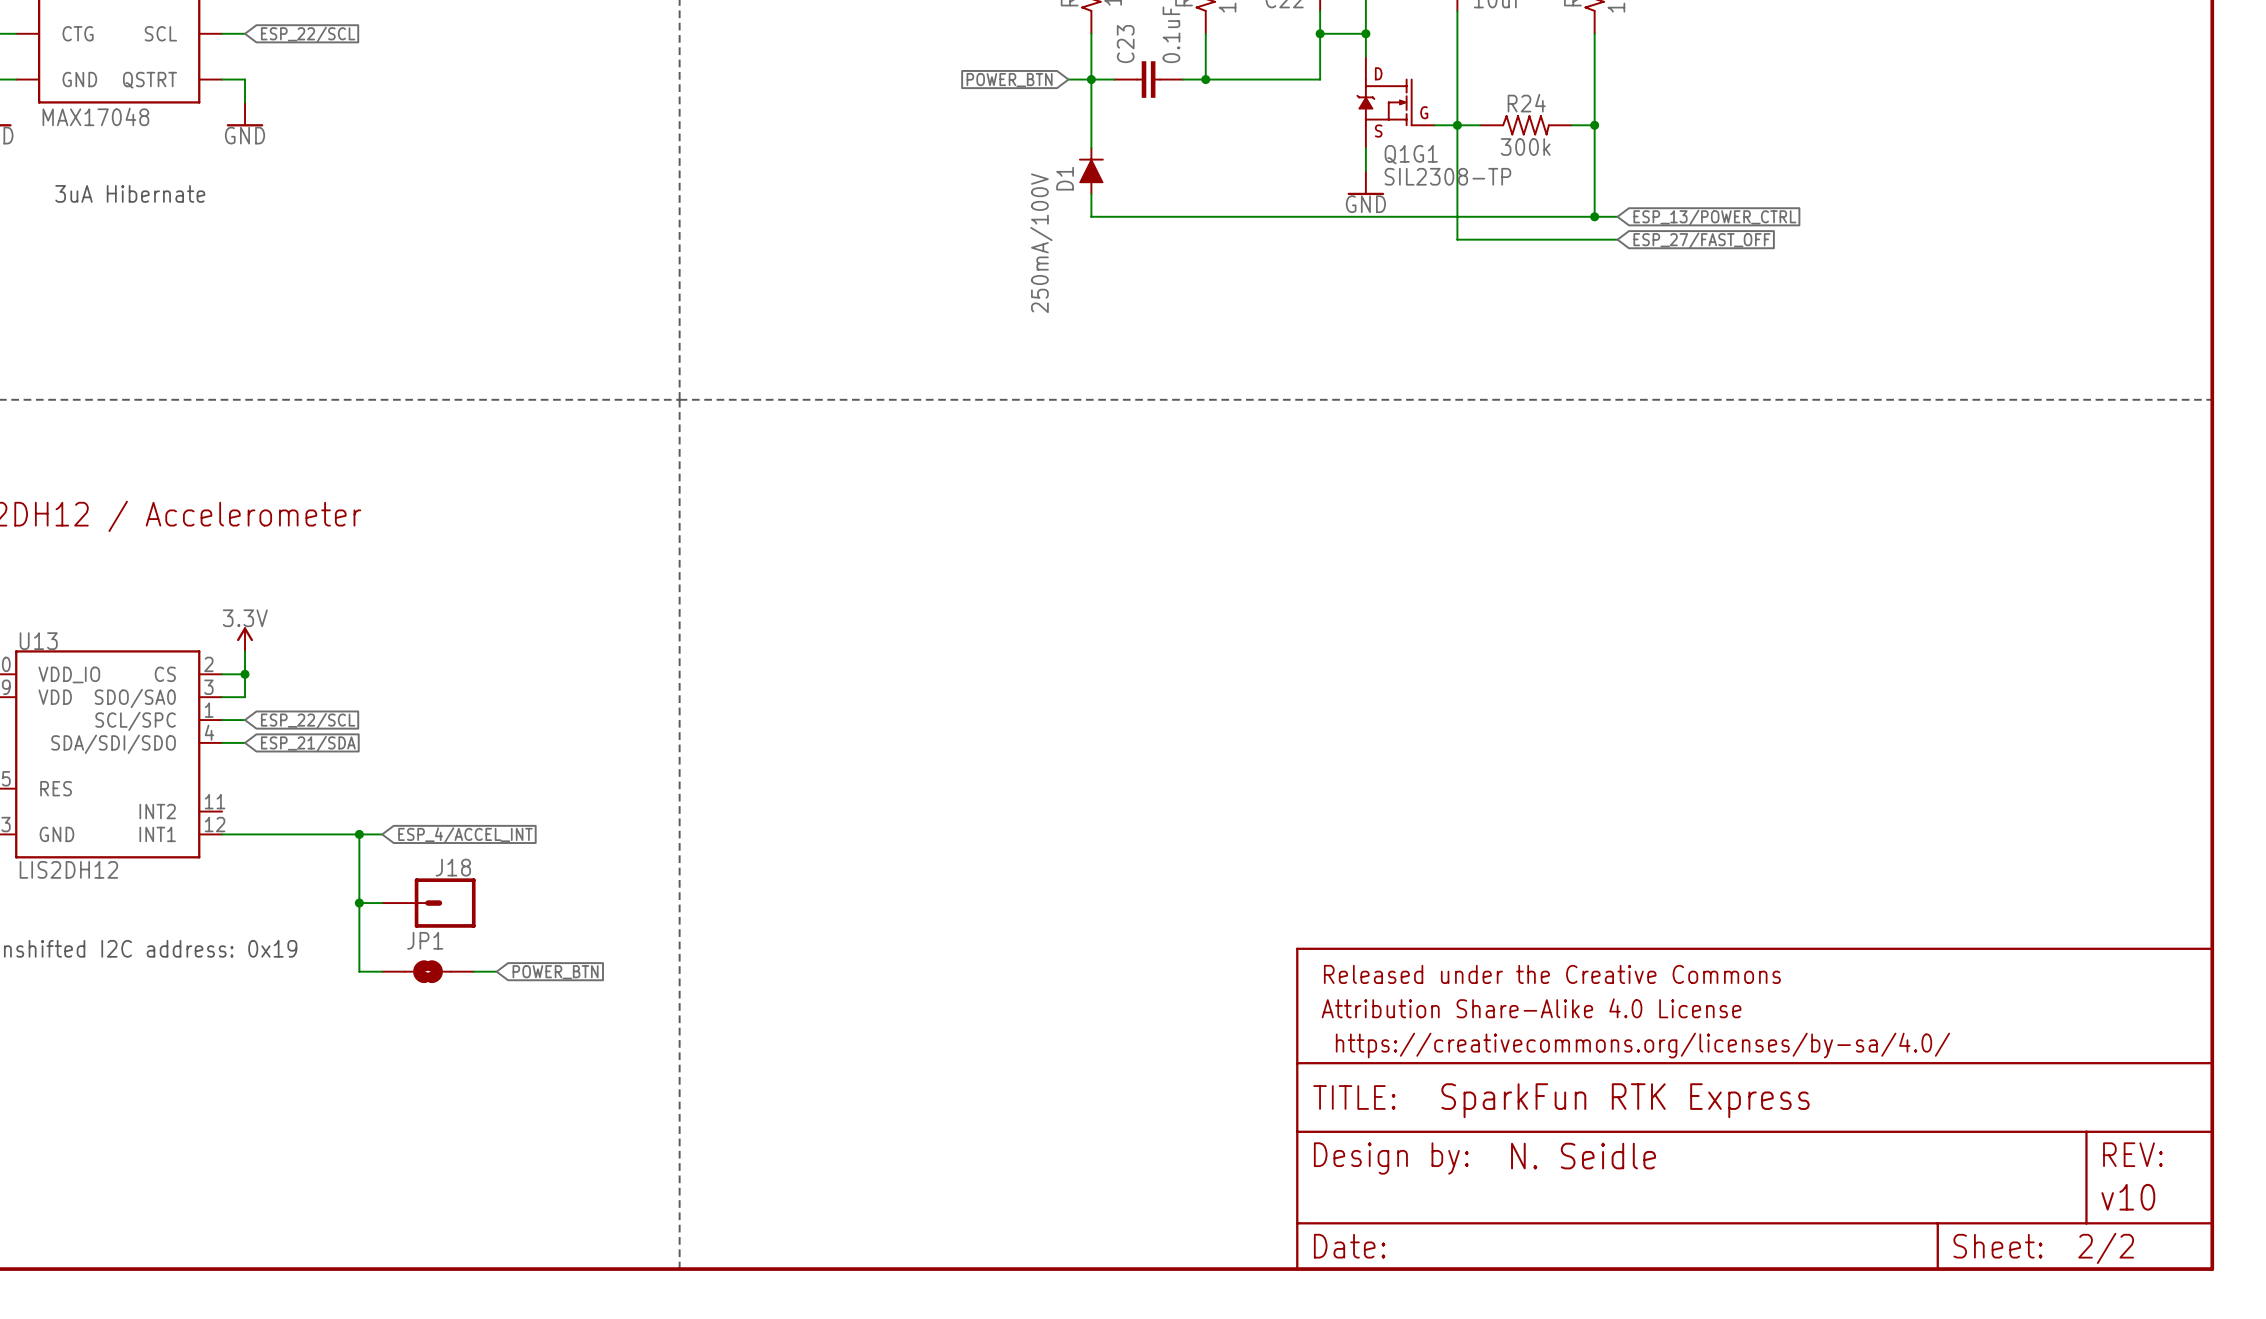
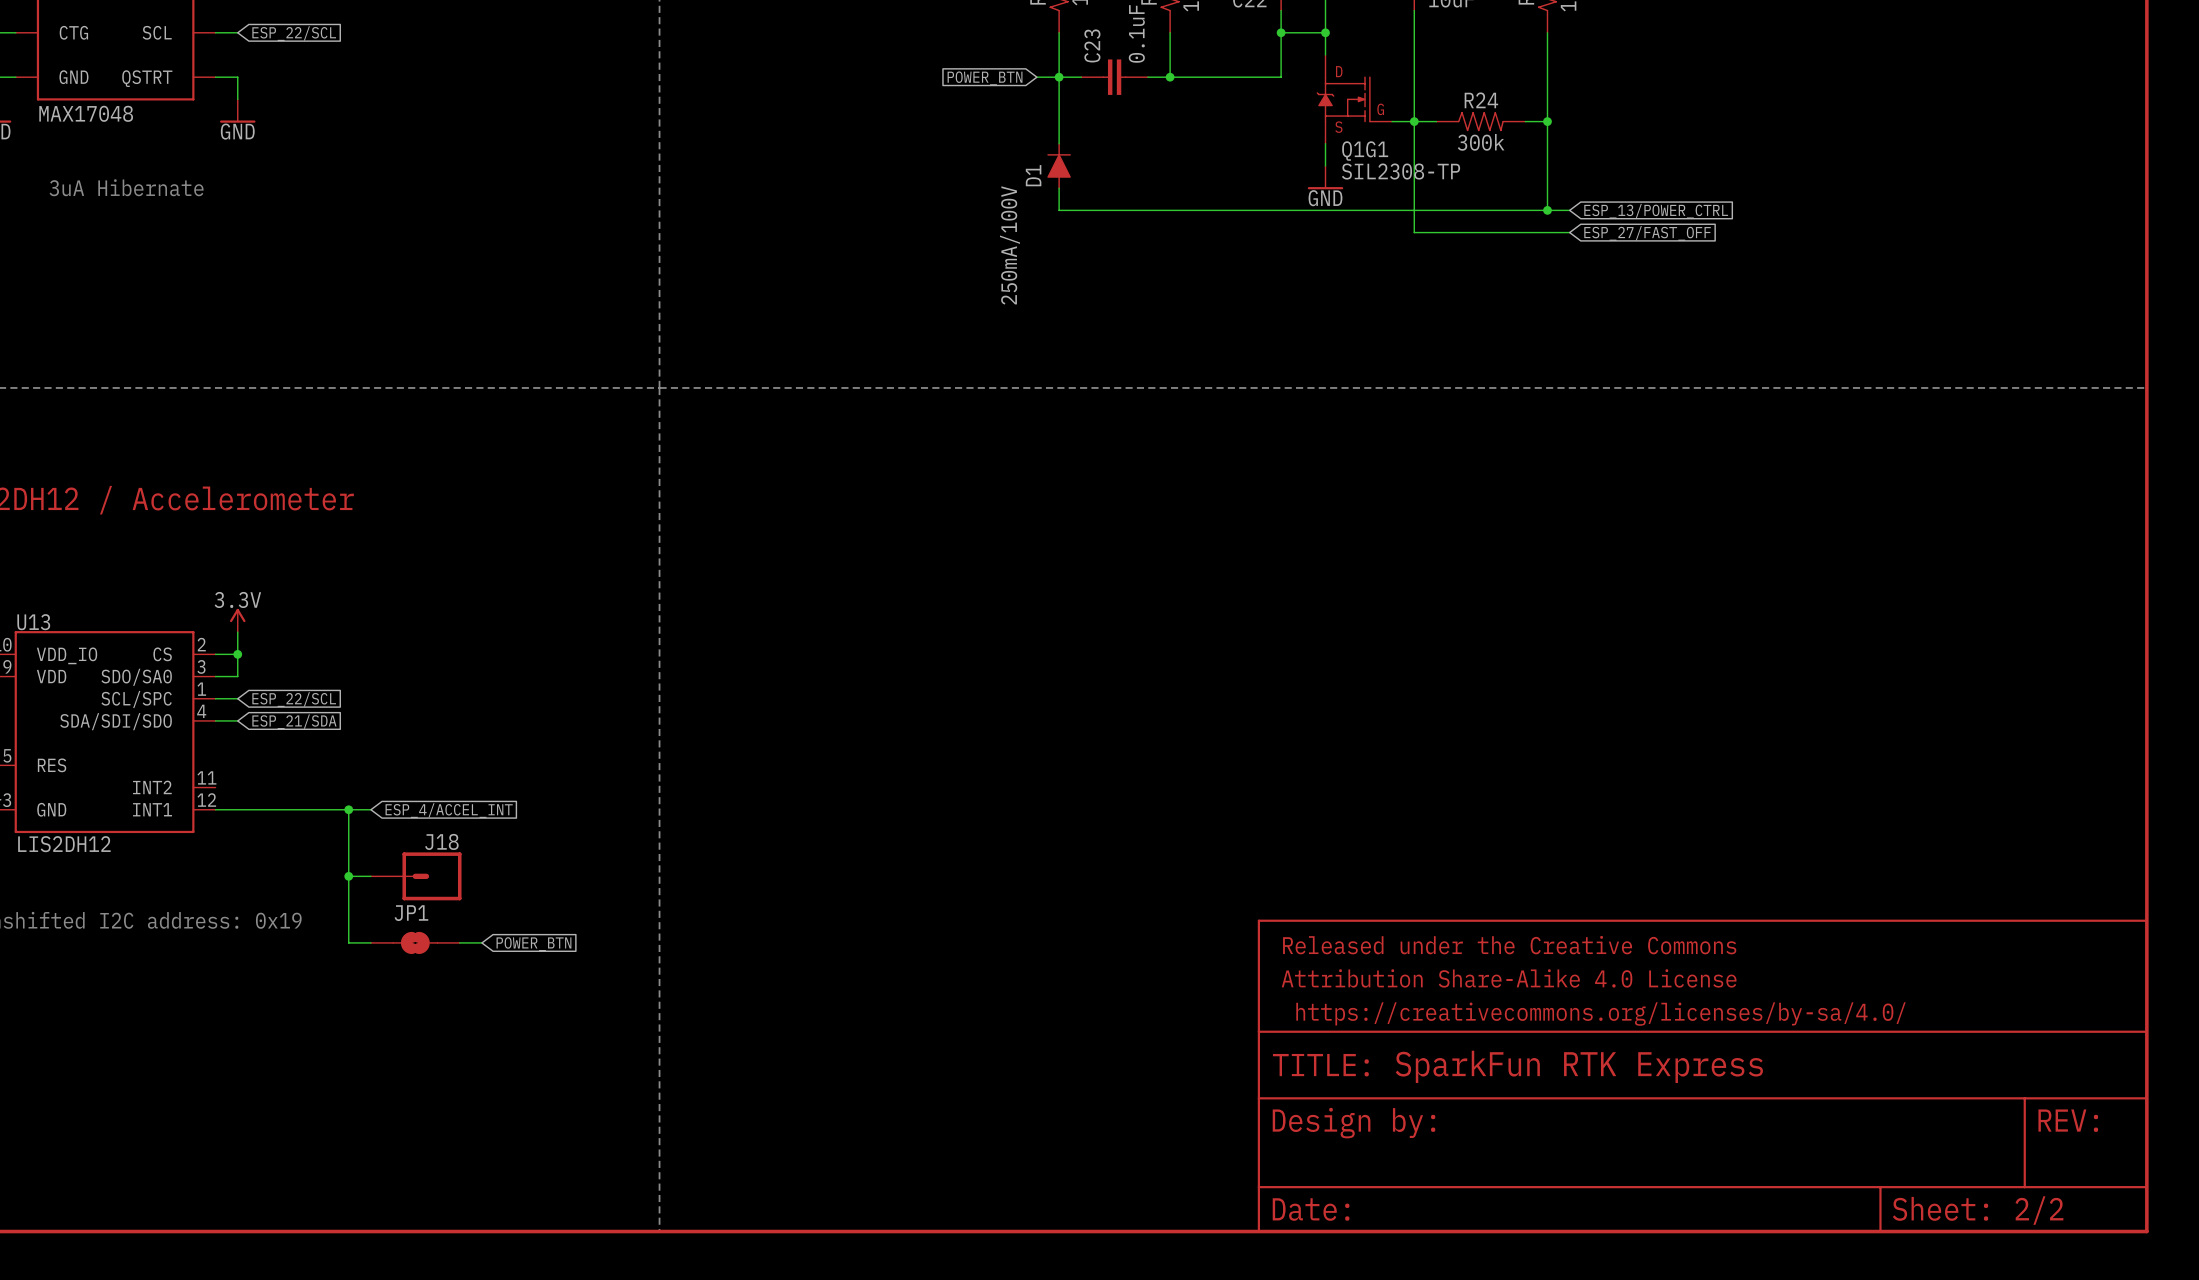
part text: N. Seidle (1583, 1156) -> none
part text: v10 (2128, 1197) -> none

